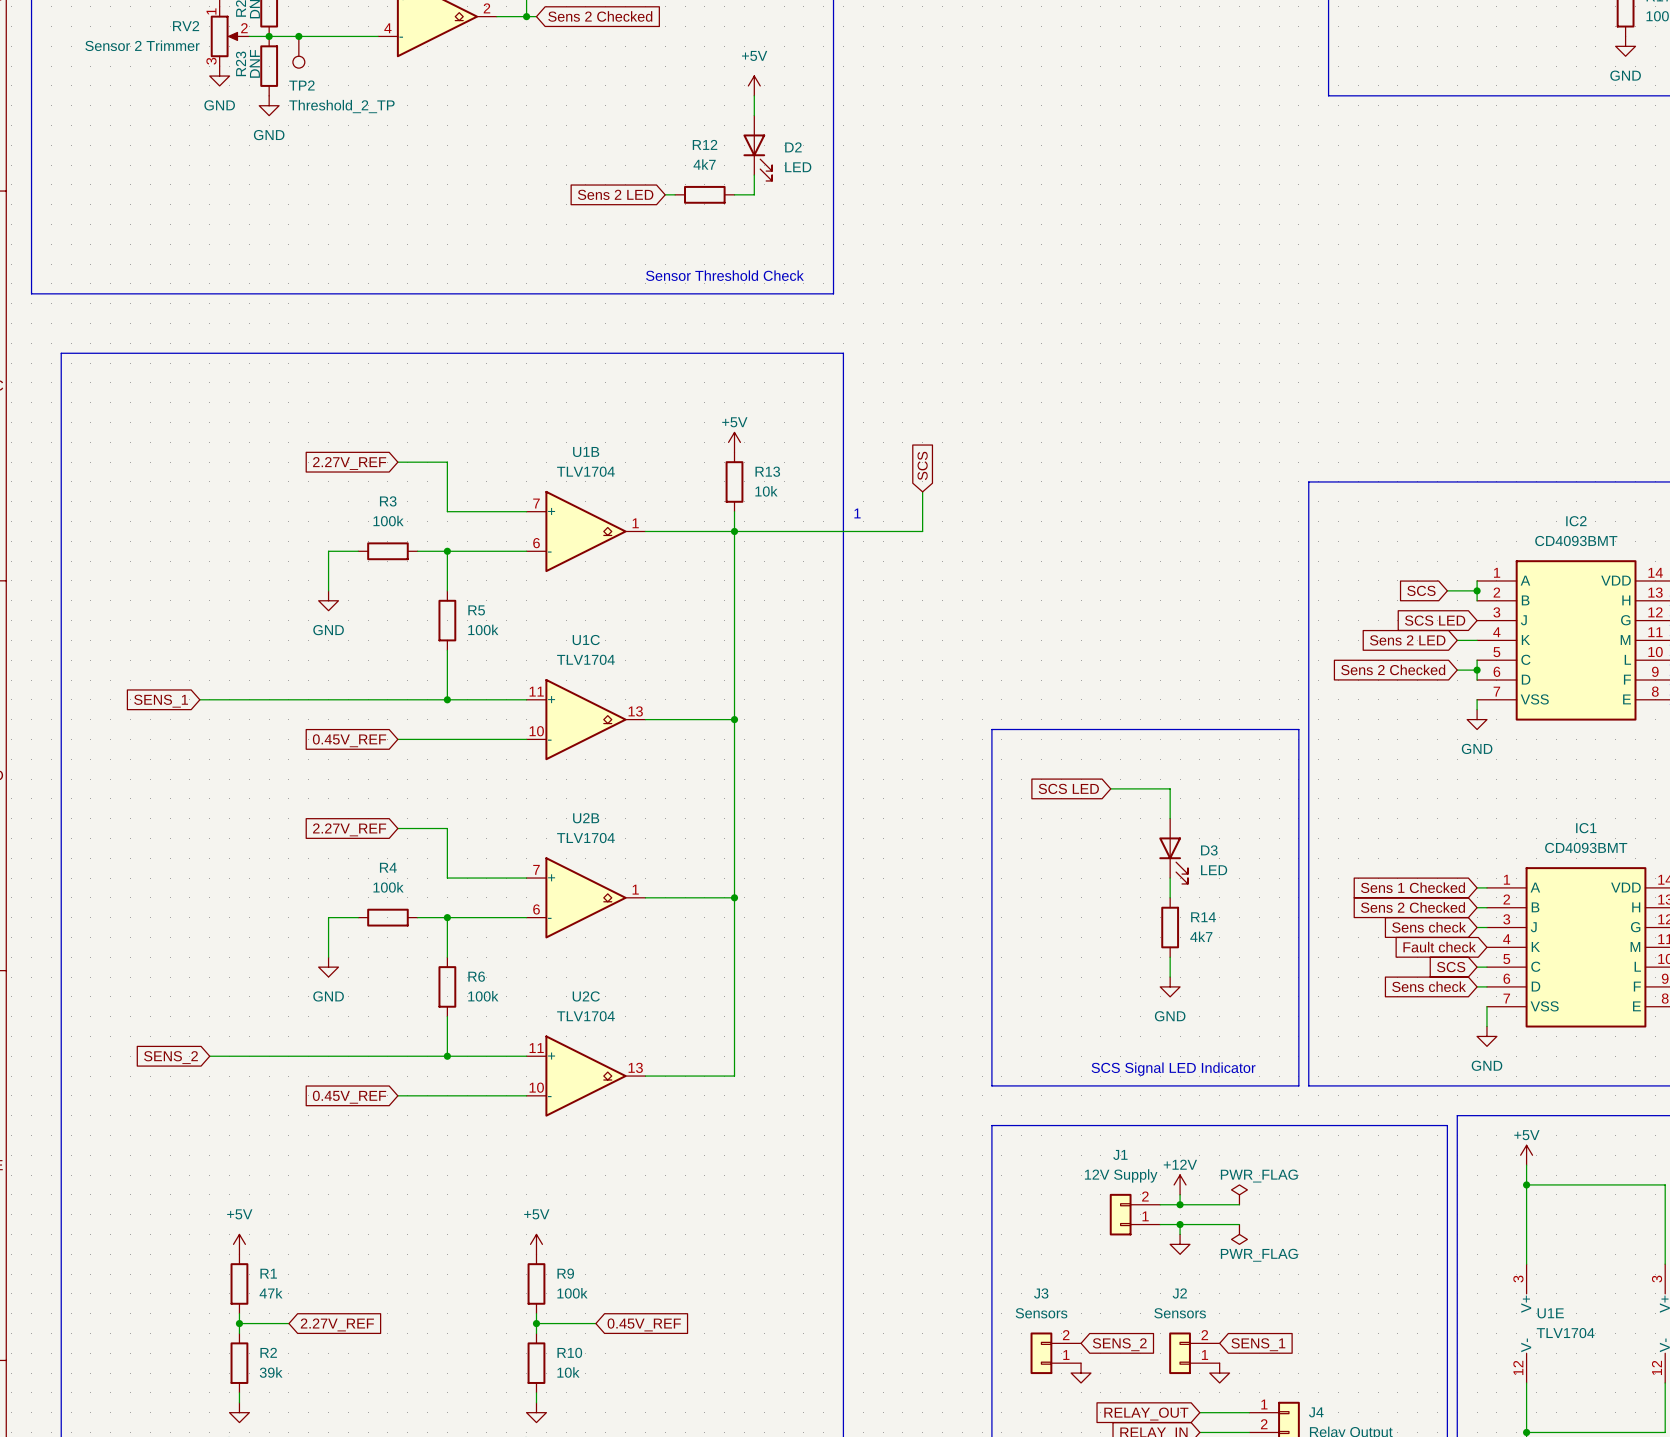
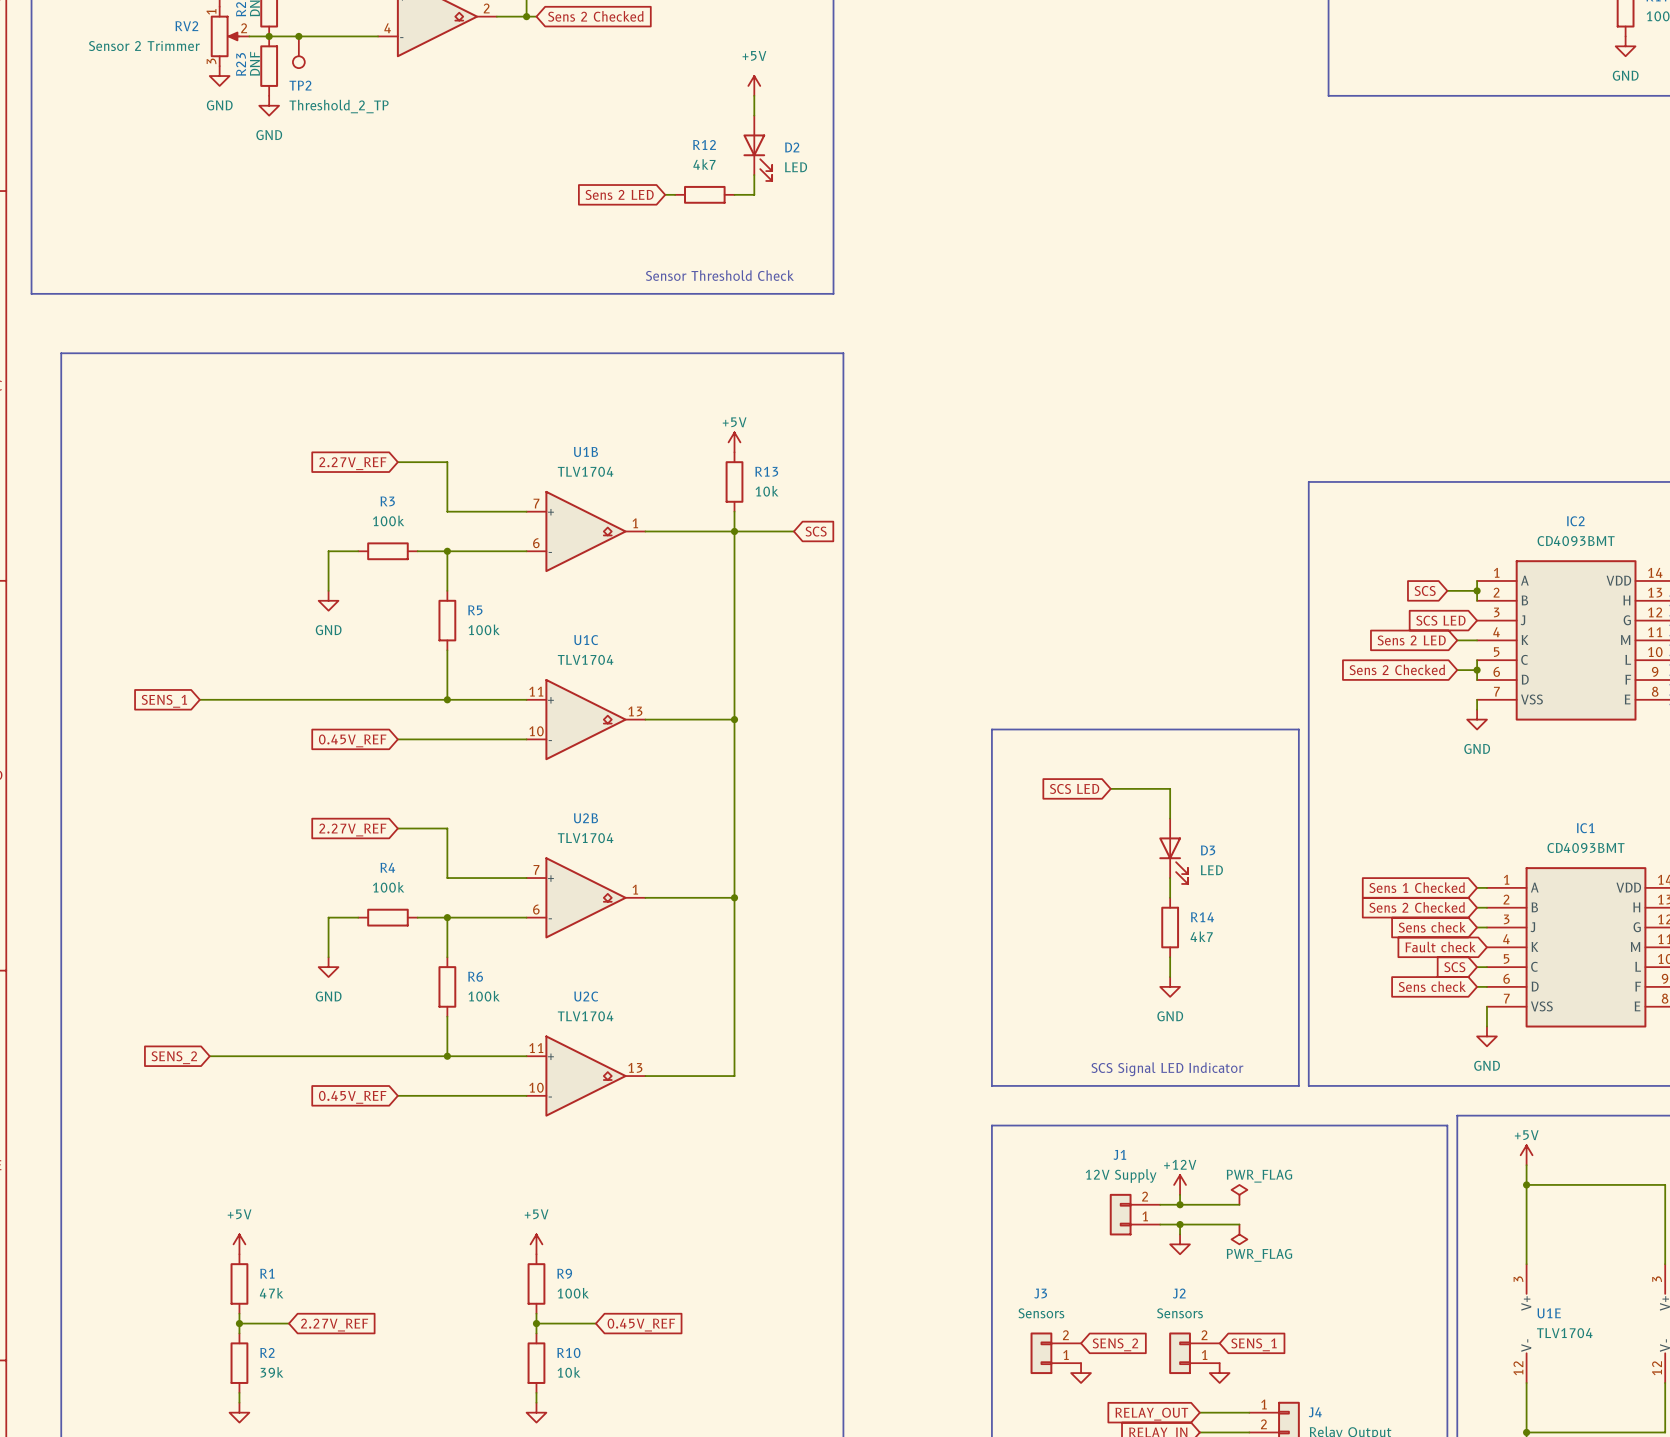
global label rotation: 0° (922, 465) -> 90° clockwise (816, 531)
global label position: SCS (922, 465) -> SCS (816, 531)
wire: (922, 491) (922, 531) (793, 531) -> none
text: 1 (857, 513) -> none

